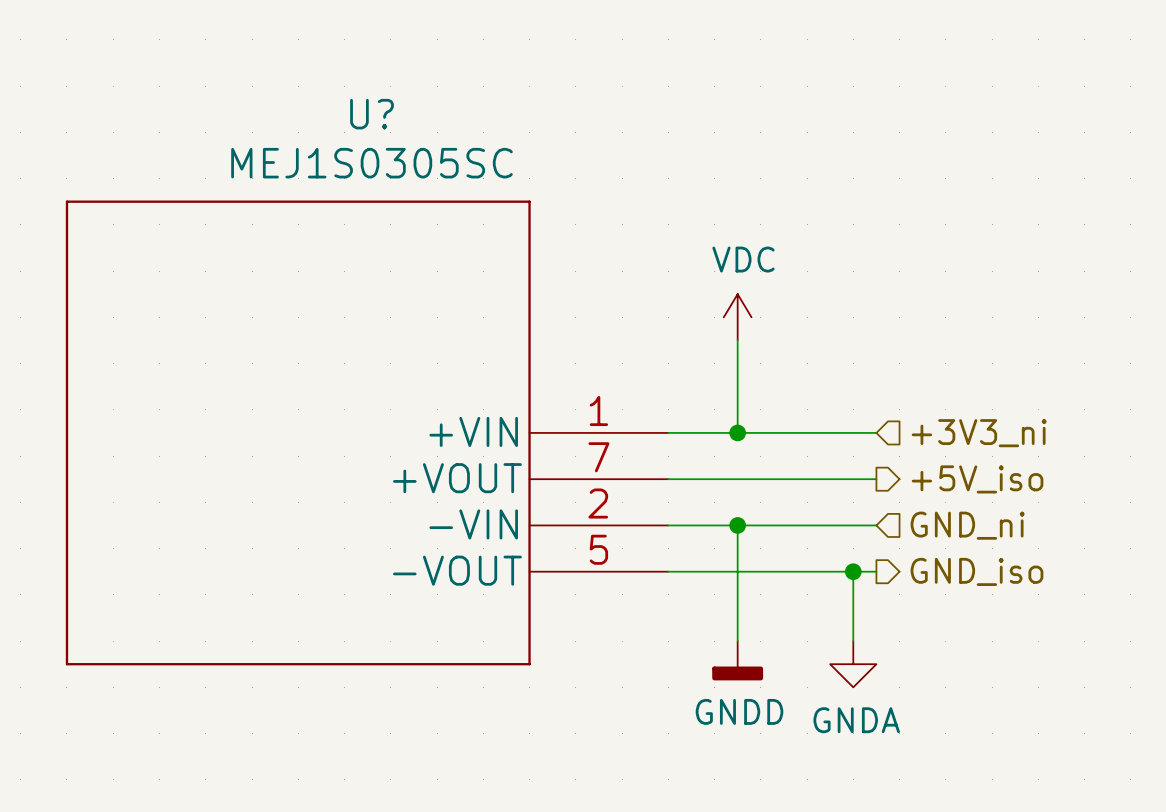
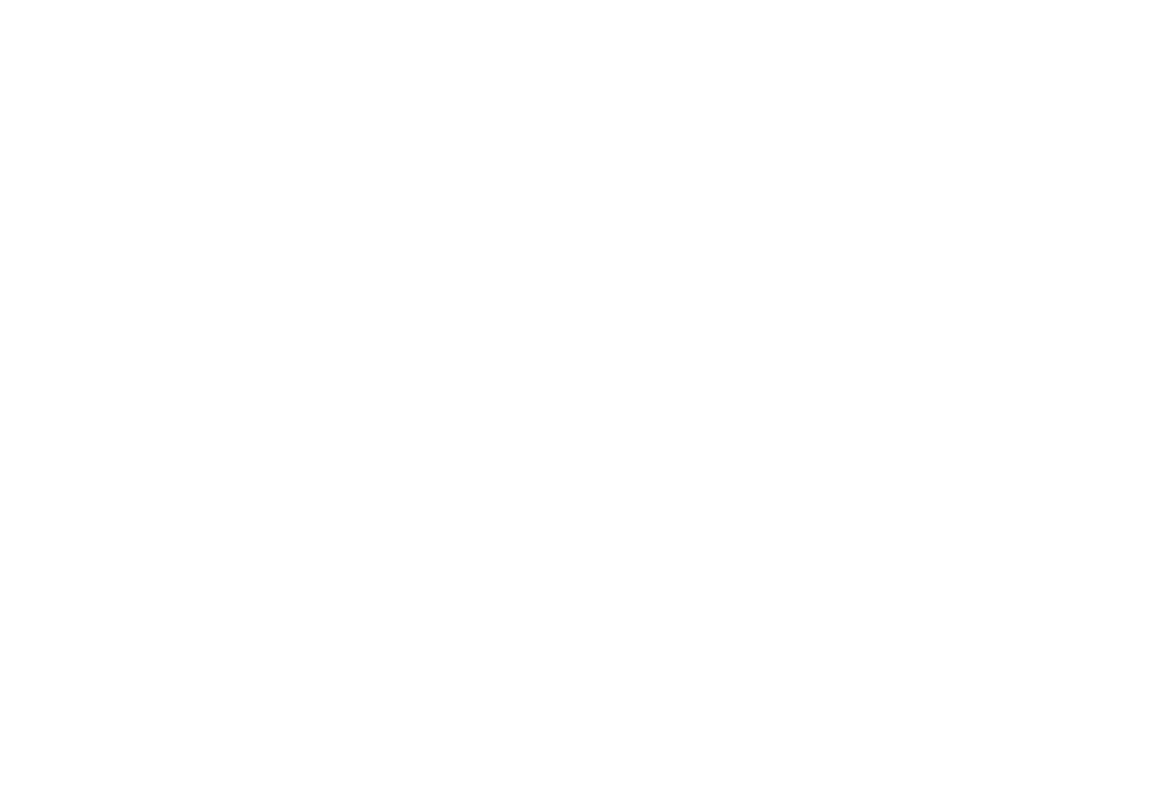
power symbol: VDC (737, 317) -> none
wire: (737, 340) (737, 432) -> none
U?: MEJ1S0305SC (367, 432) -> none
wire: (668, 432) (876, 432) -> none
junction: (737, 432) -> none
hierarchical label: +3V3_ni (979, 433) -> none
wire: (668, 479) (876, 479) -> none
hierarchical label: +5V_iso (977, 479) -> none
wire: (668, 525) (876, 525) -> none
wire: (737, 525) (737, 641) -> none
junction: (737, 525) -> none
hierarchical label: GND_ni (967, 525) -> none
wire: (668, 571) (876, 571) -> none
wire: (853, 571) (853, 641) -> none
junction: (853, 571) -> none
hierarchical label: GND_iso (976, 571) -> none
power symbol: GNDD (737, 660) -> none
power symbol: GNDA (853, 664) -> none

